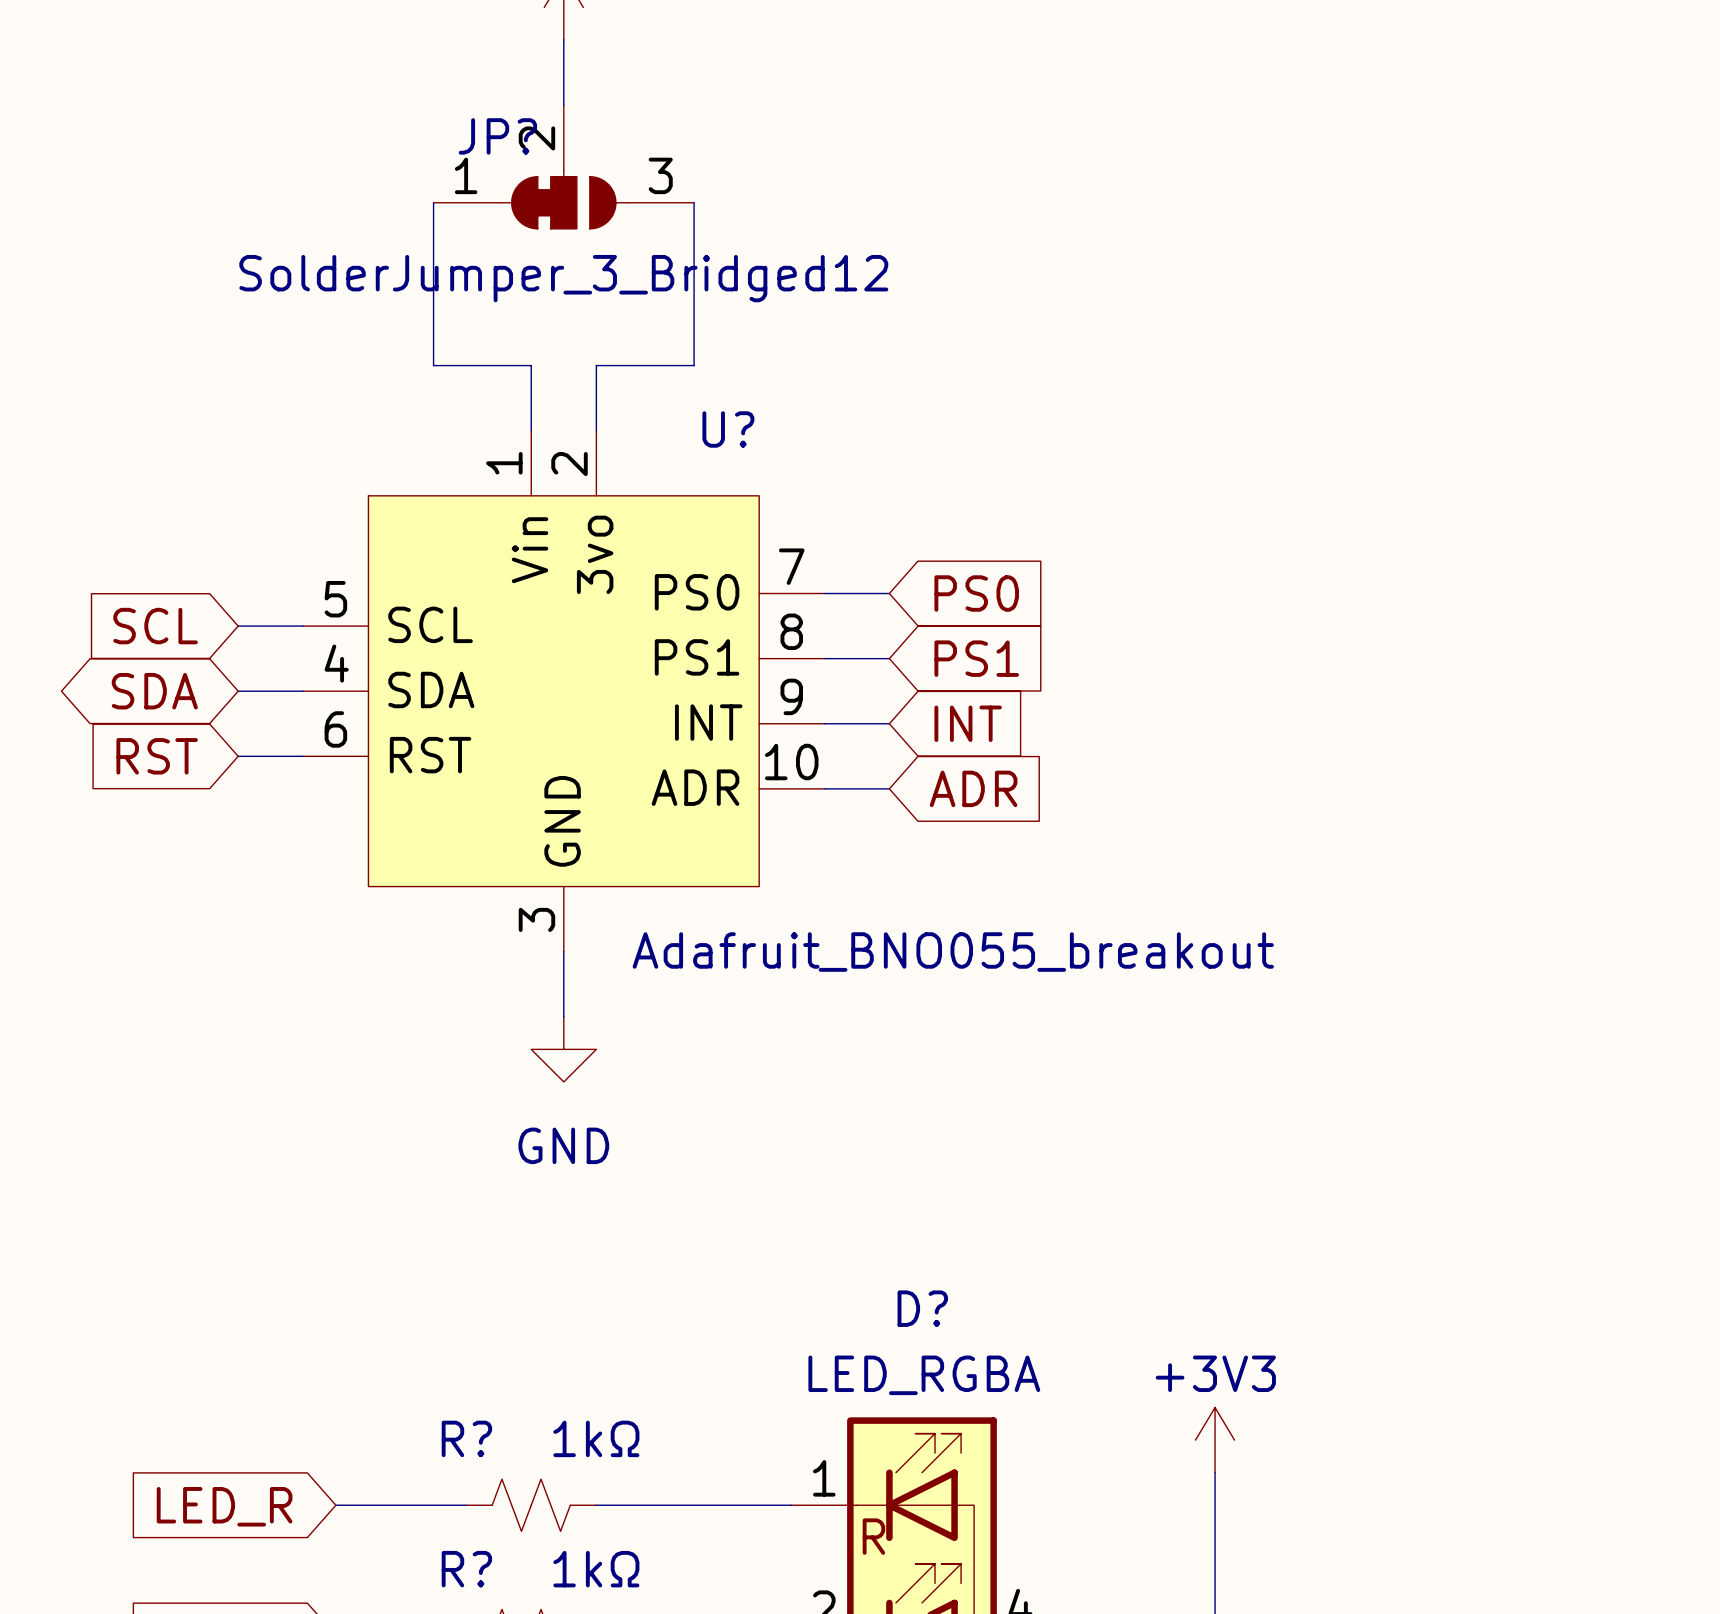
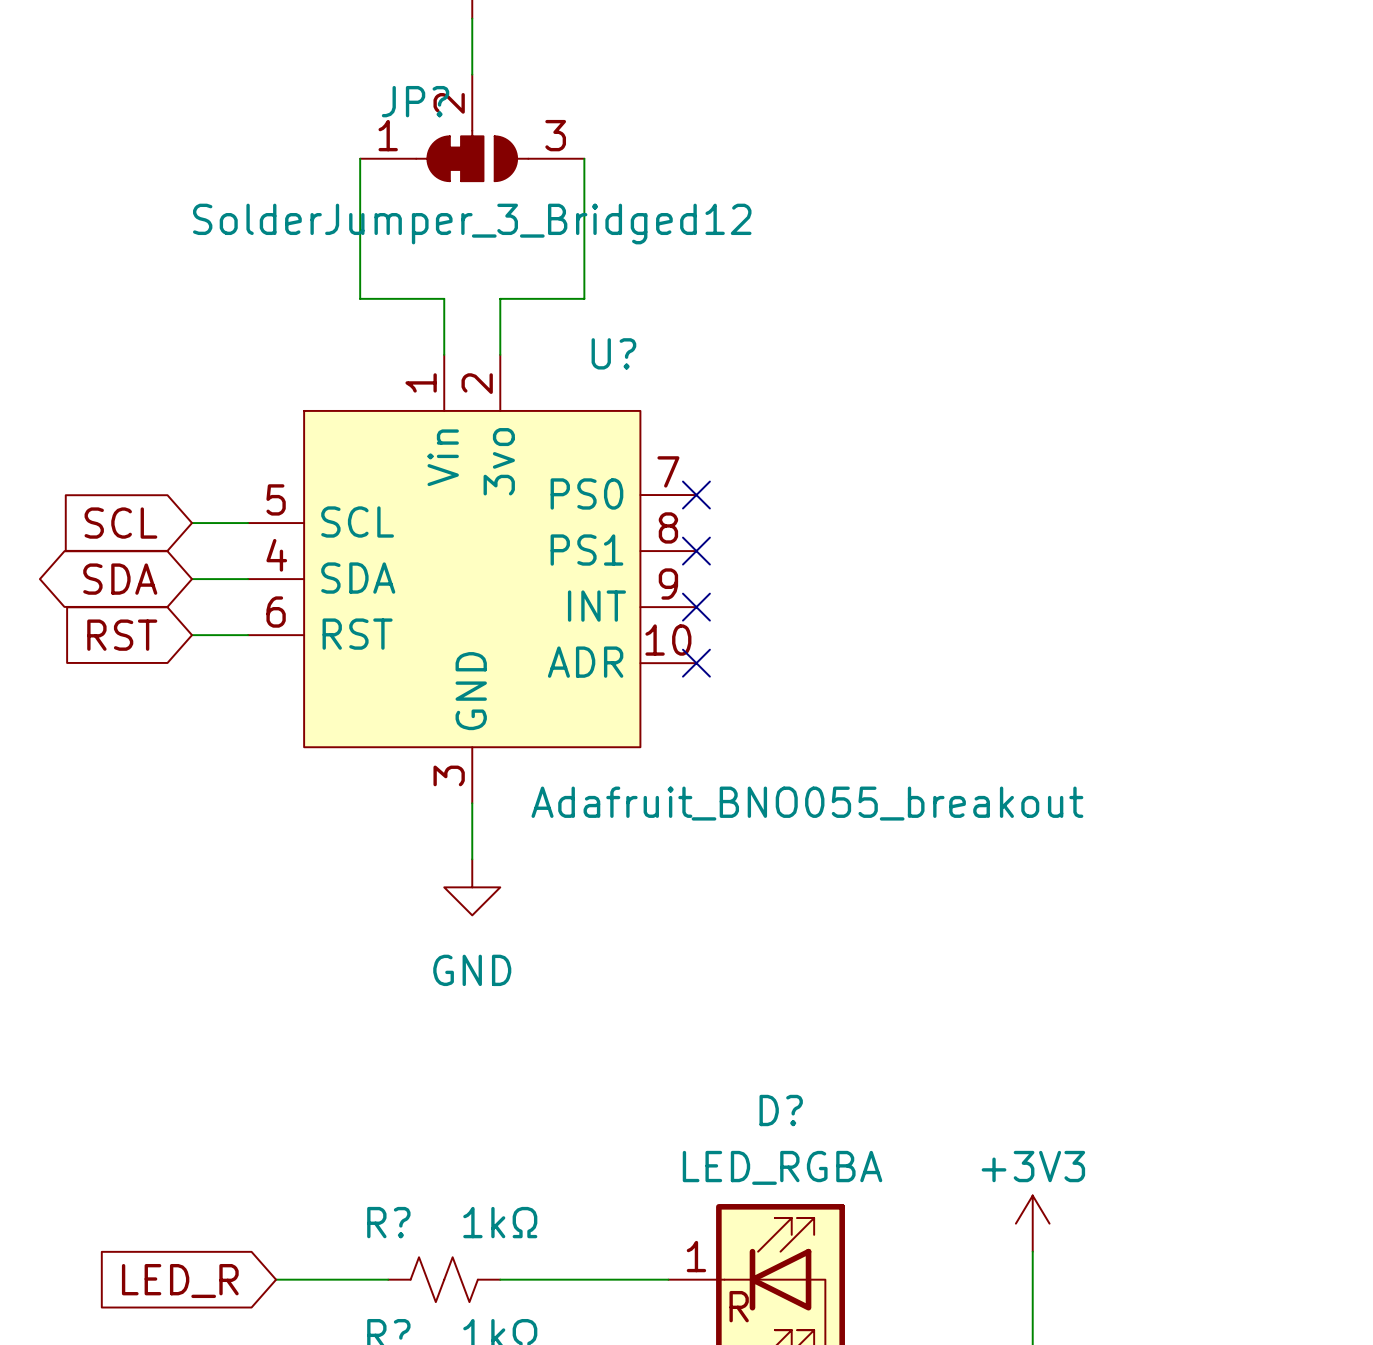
wire: (824, 593) (889, 593) -> none
no-connect mark: none -> (696, 495)
global label: PS0 (976, 593) -> none
wire: (824, 658) (889, 658) -> none
no-connect mark: none -> (696, 551)
global label: PS1 (976, 658) -> none
wire: (824, 723) (889, 723) -> none
no-connect mark: none -> (696, 607)
global label: INT (968, 723) -> none
wire: (824, 788) (889, 788) -> none
no-connect mark: none -> (696, 663)
global label: ADR (973, 788) -> none

